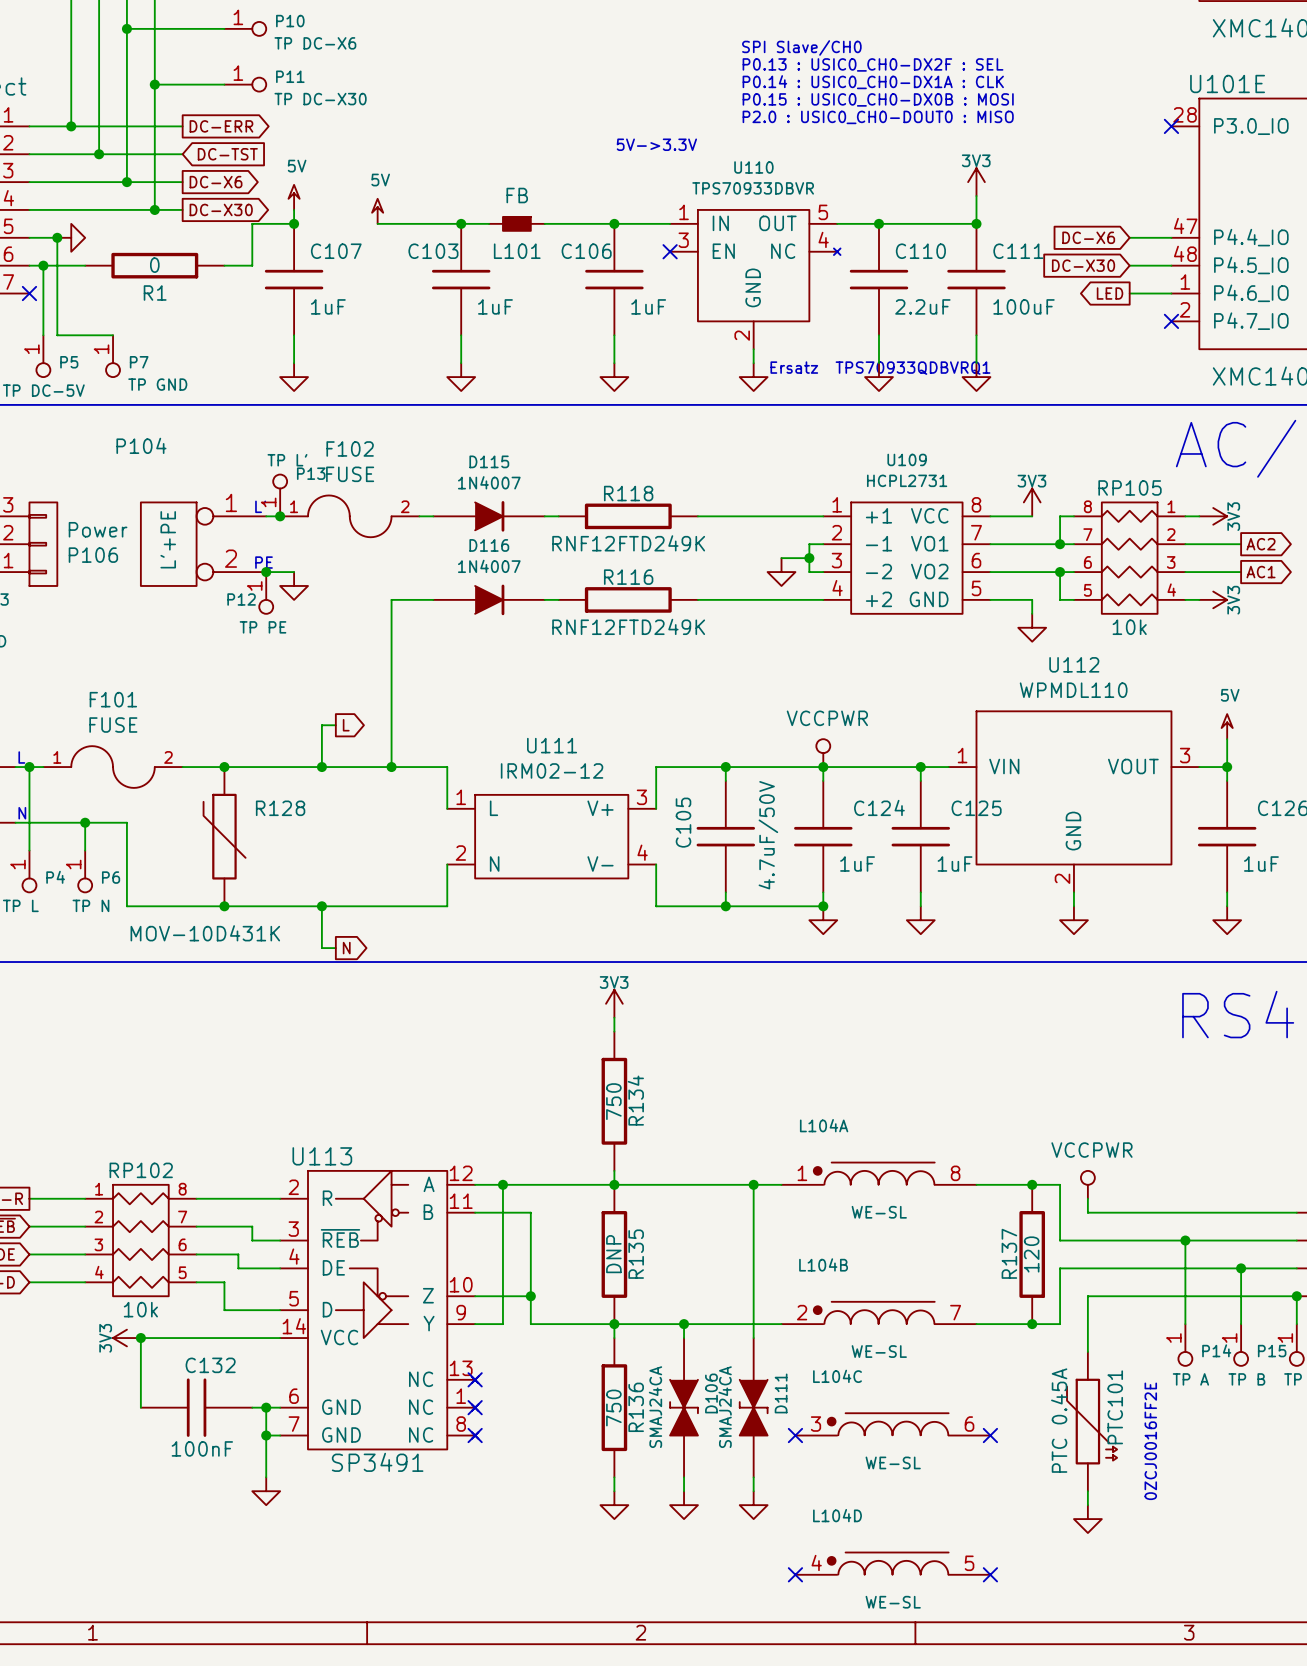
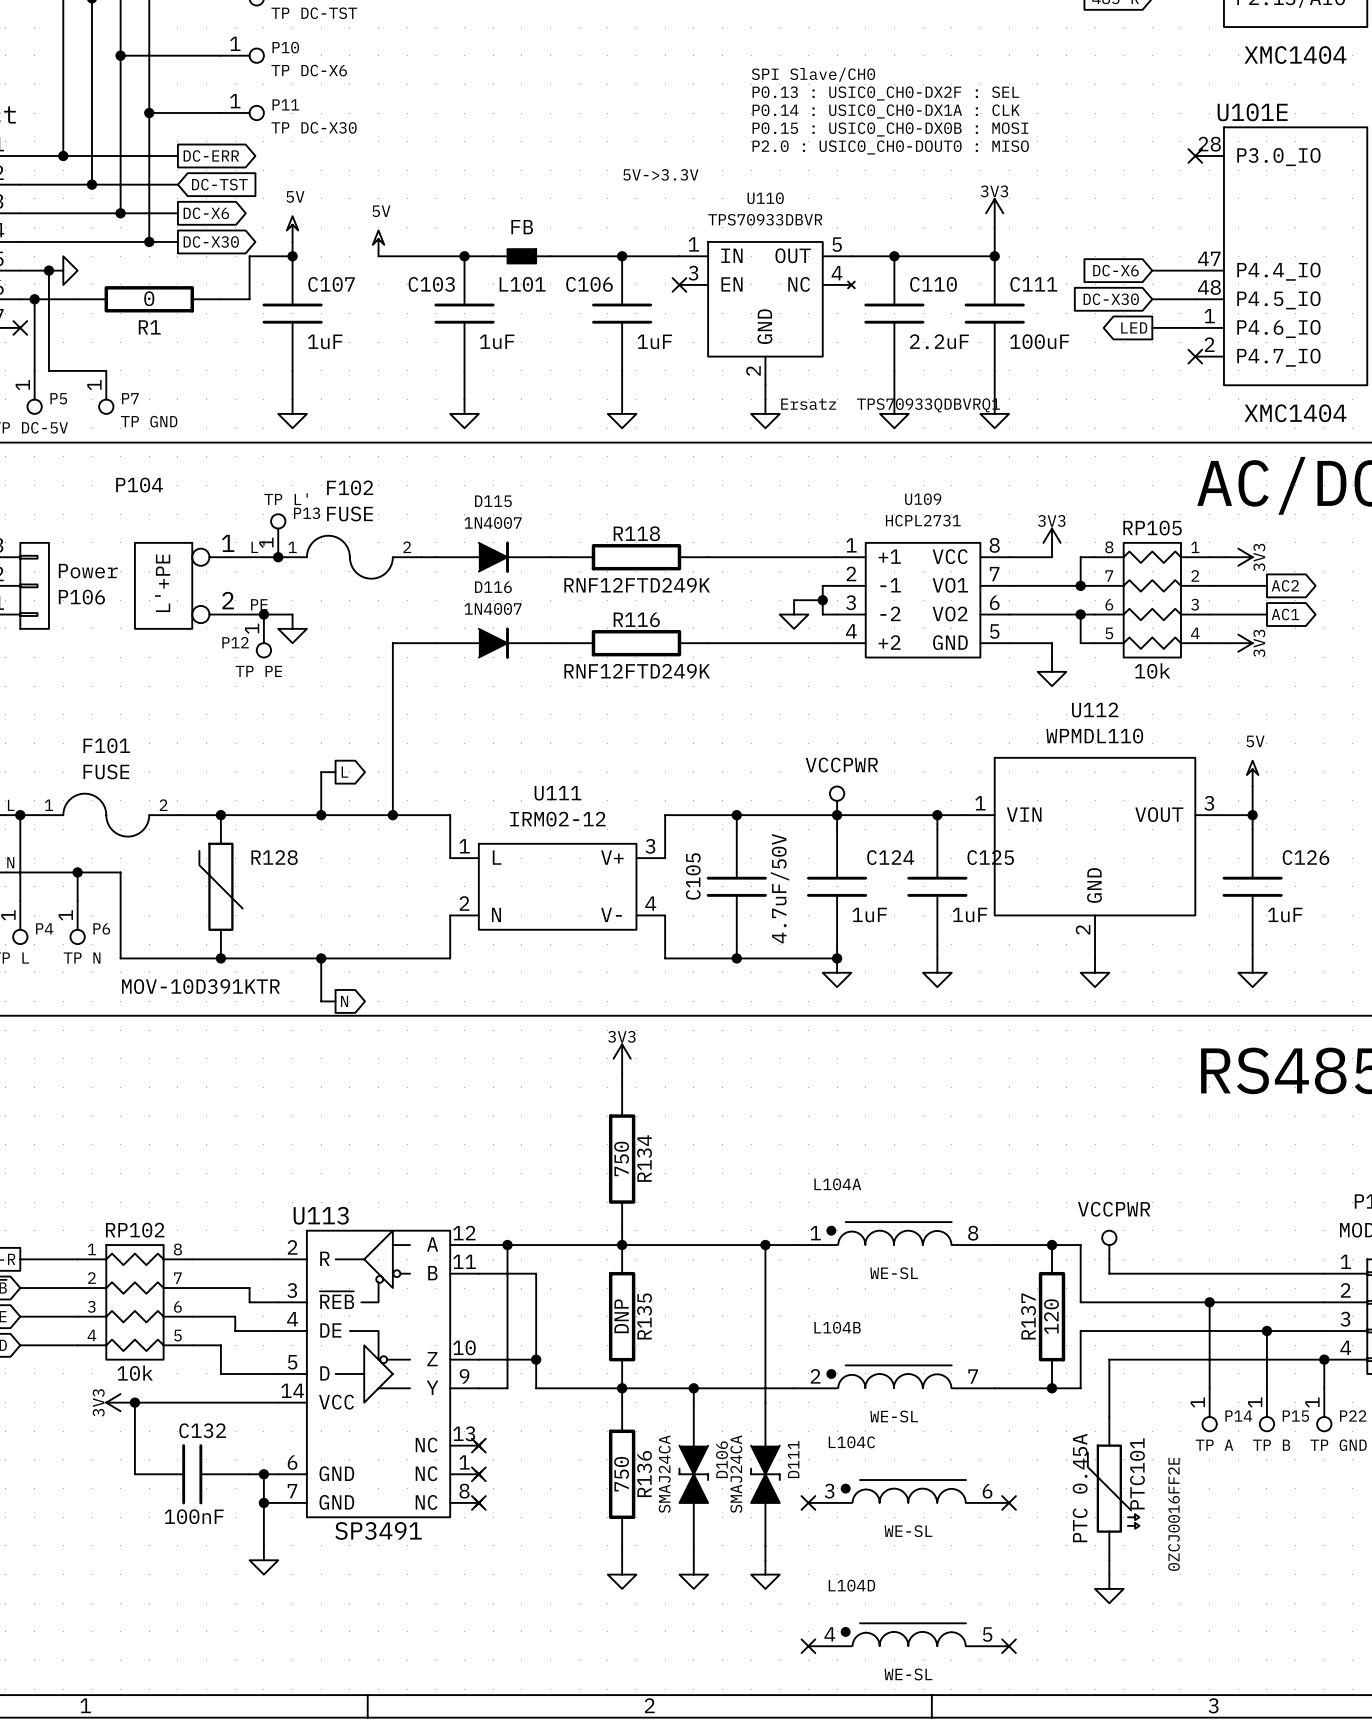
R128 value: MOV-10D431K (205, 933) -> MOV-10D391KTR (200, 986)

